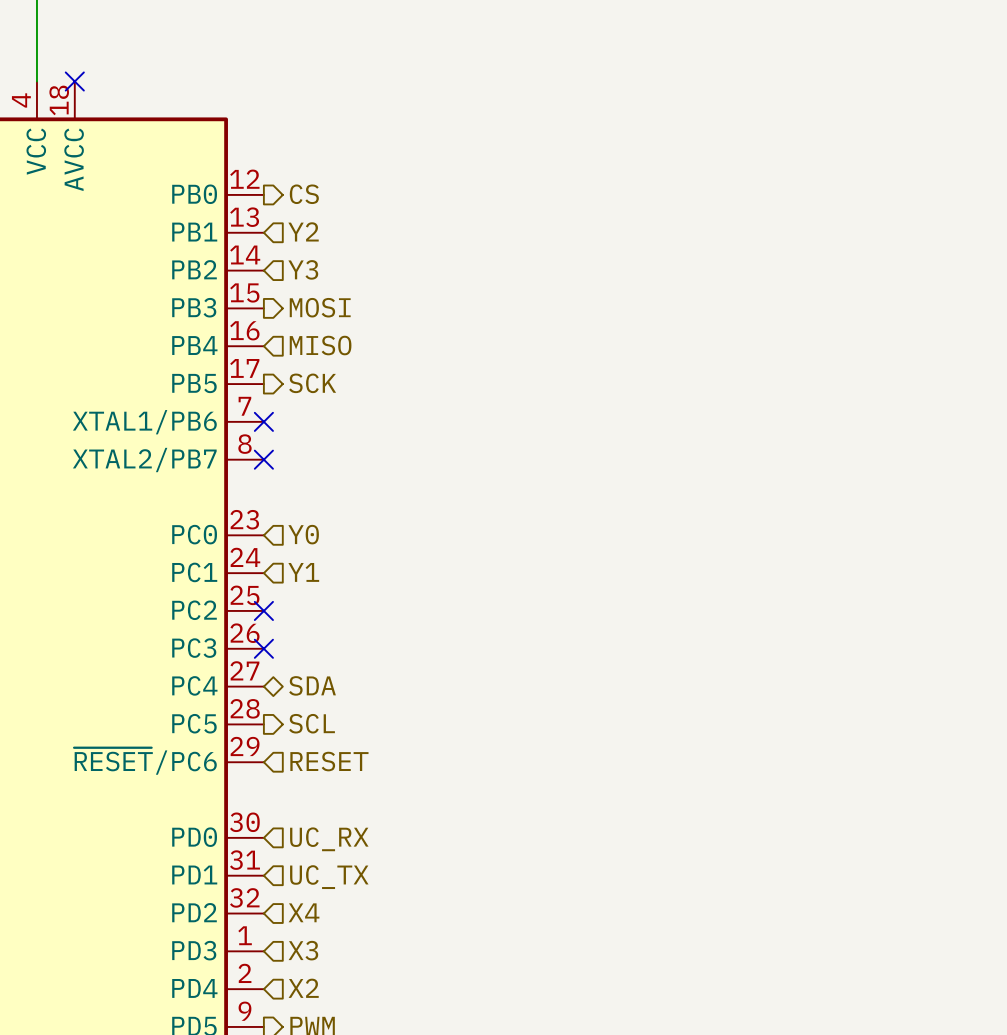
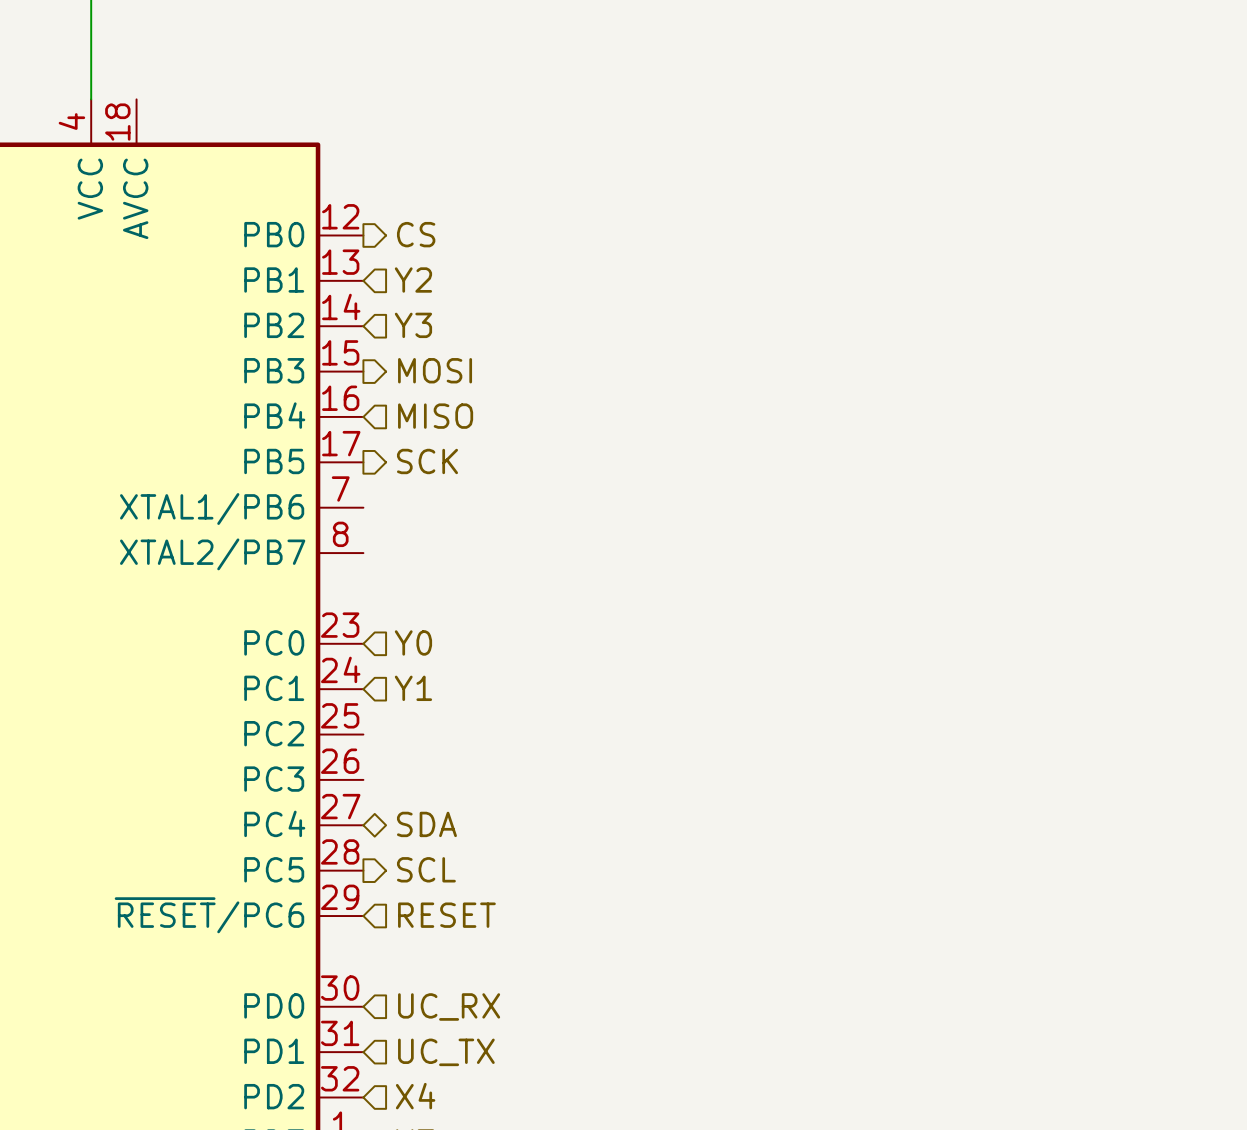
no-connect mark: (74, 81) -> none
no-connect mark: (263, 421) -> none
no-connect mark: (263, 459) -> none
no-connect mark: (263, 610) -> none
no-connect mark: (263, 648) -> none

